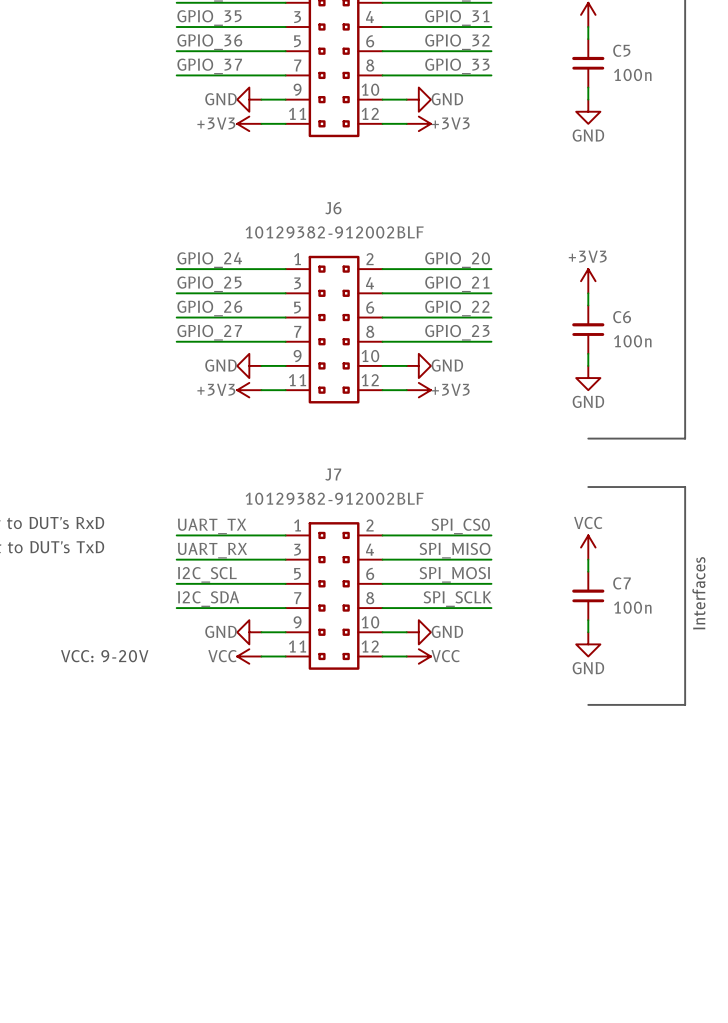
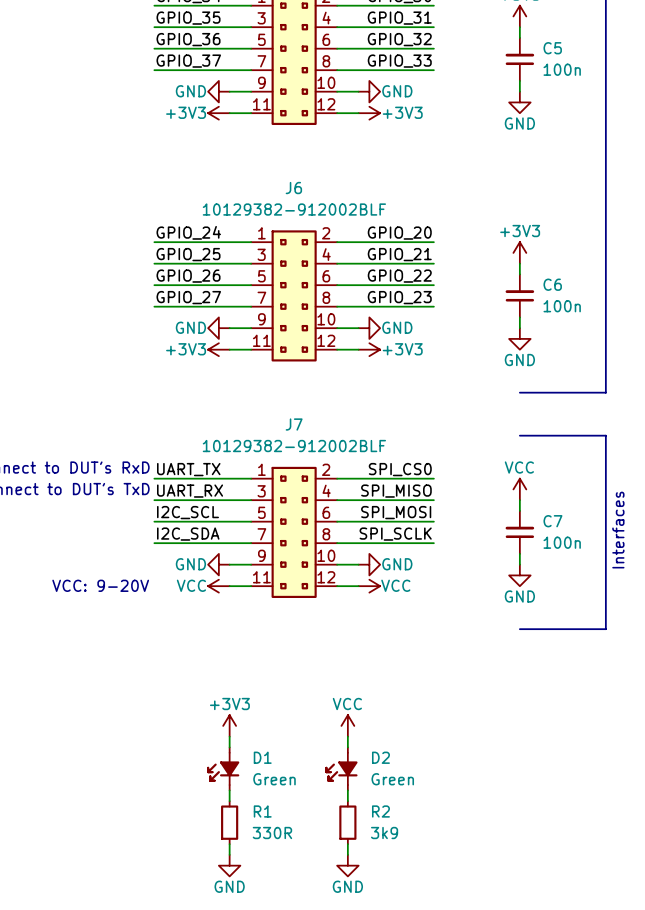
power symbol: none -> +3V3 (229, 725)
power symbol: none -> VCC (347, 725)
wire: none -> (229, 736) (229, 747)
wire: none -> (347, 736) (347, 747)
D1: none -> (223, 768)
D2: none -> (341, 768)
wire: none -> (229, 790) (229, 801)
wire: none -> (347, 790) (347, 801)
R1: none -> (229, 822)
R2: none -> (347, 822)
wire: none -> (229, 844) (229, 854)
wire: none -> (347, 844) (347, 854)
power symbol: none -> GND (229, 865)
power symbol: none -> GND (347, 865)

